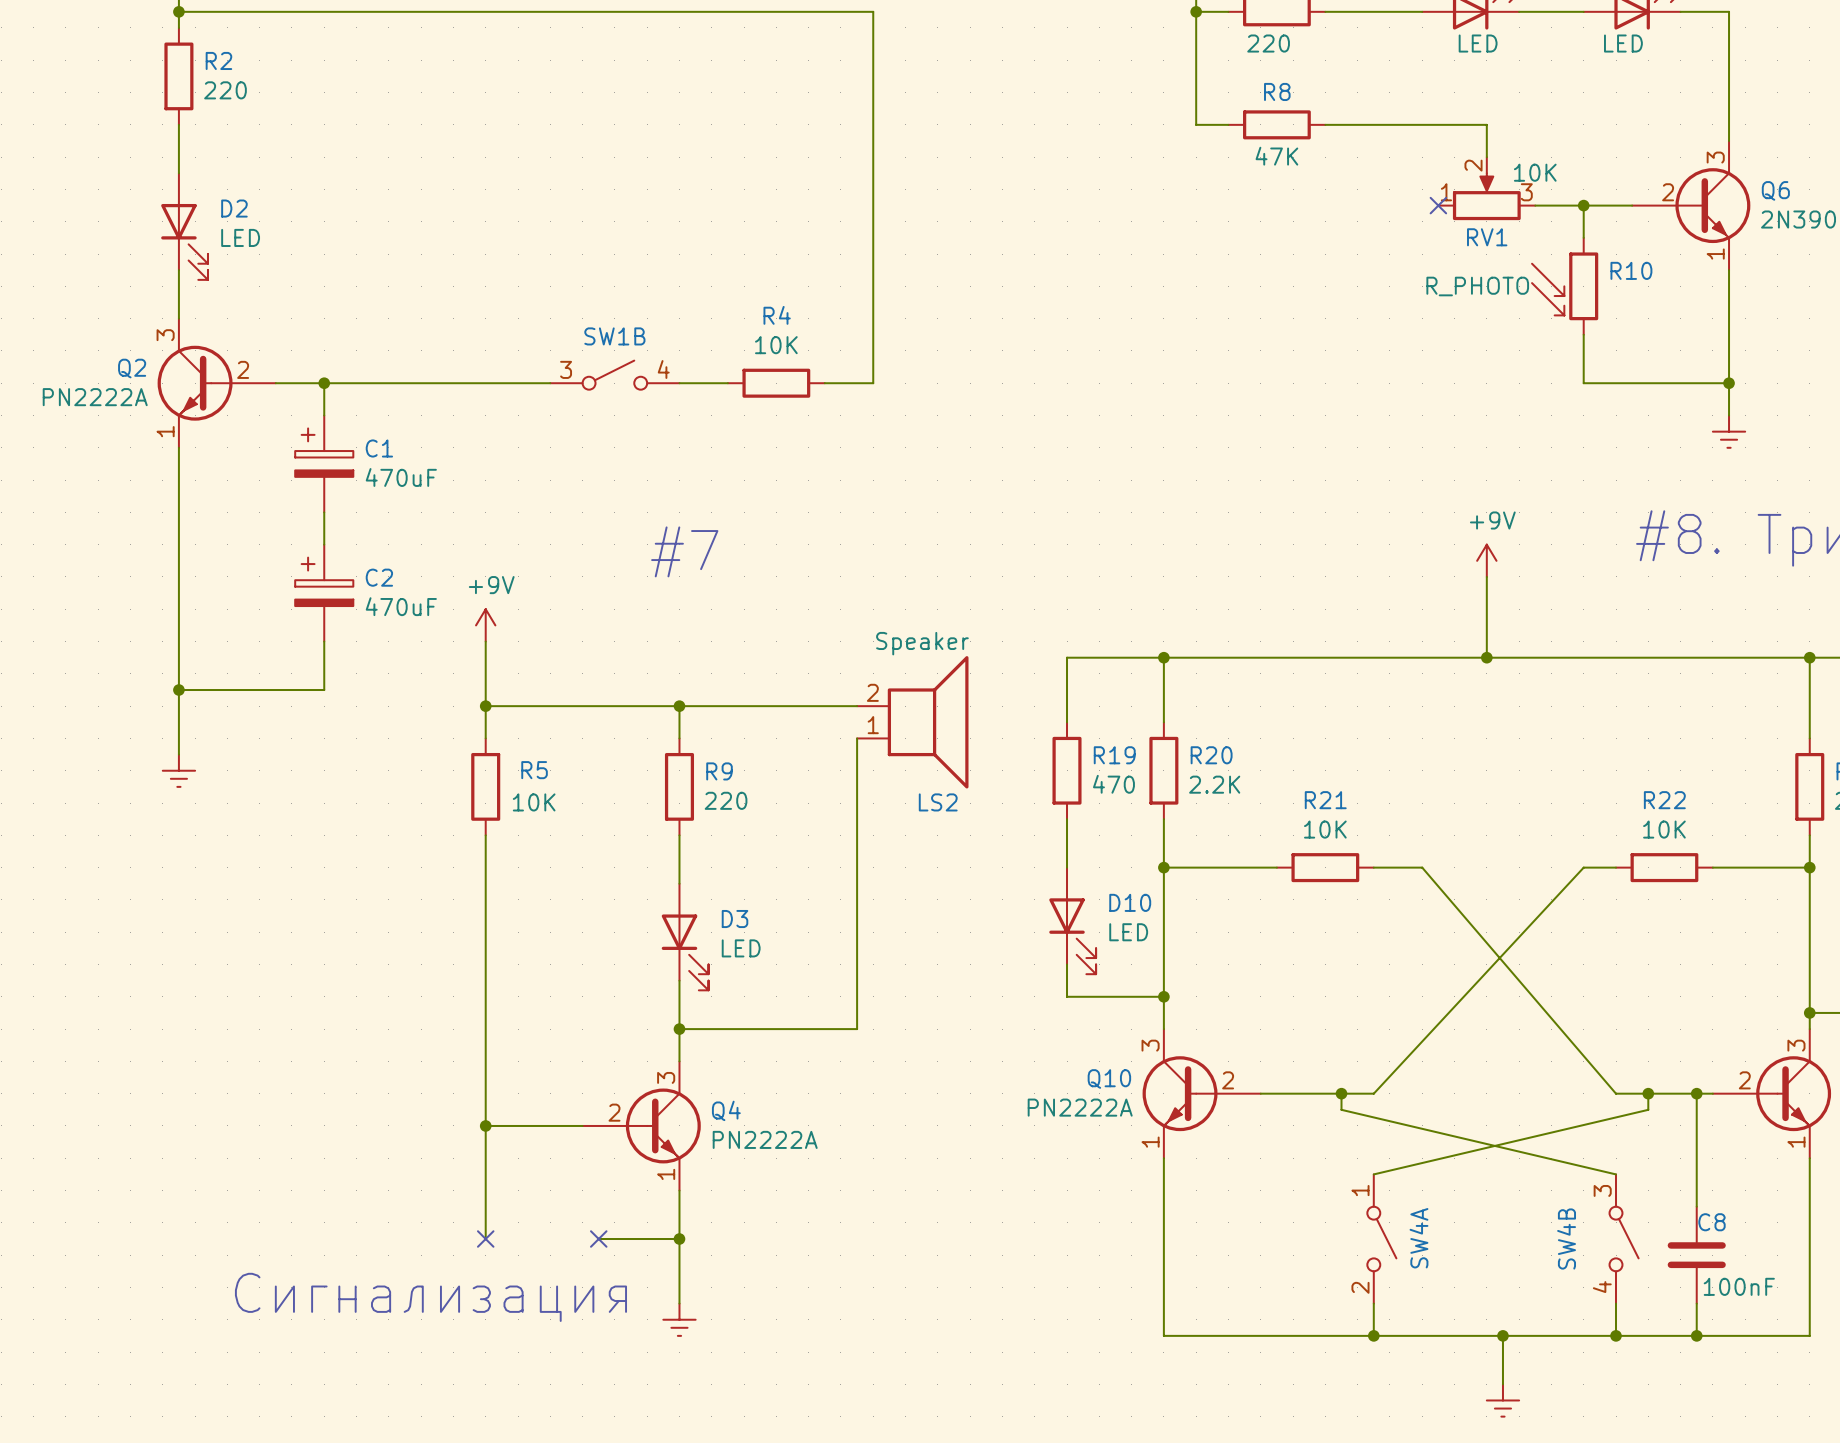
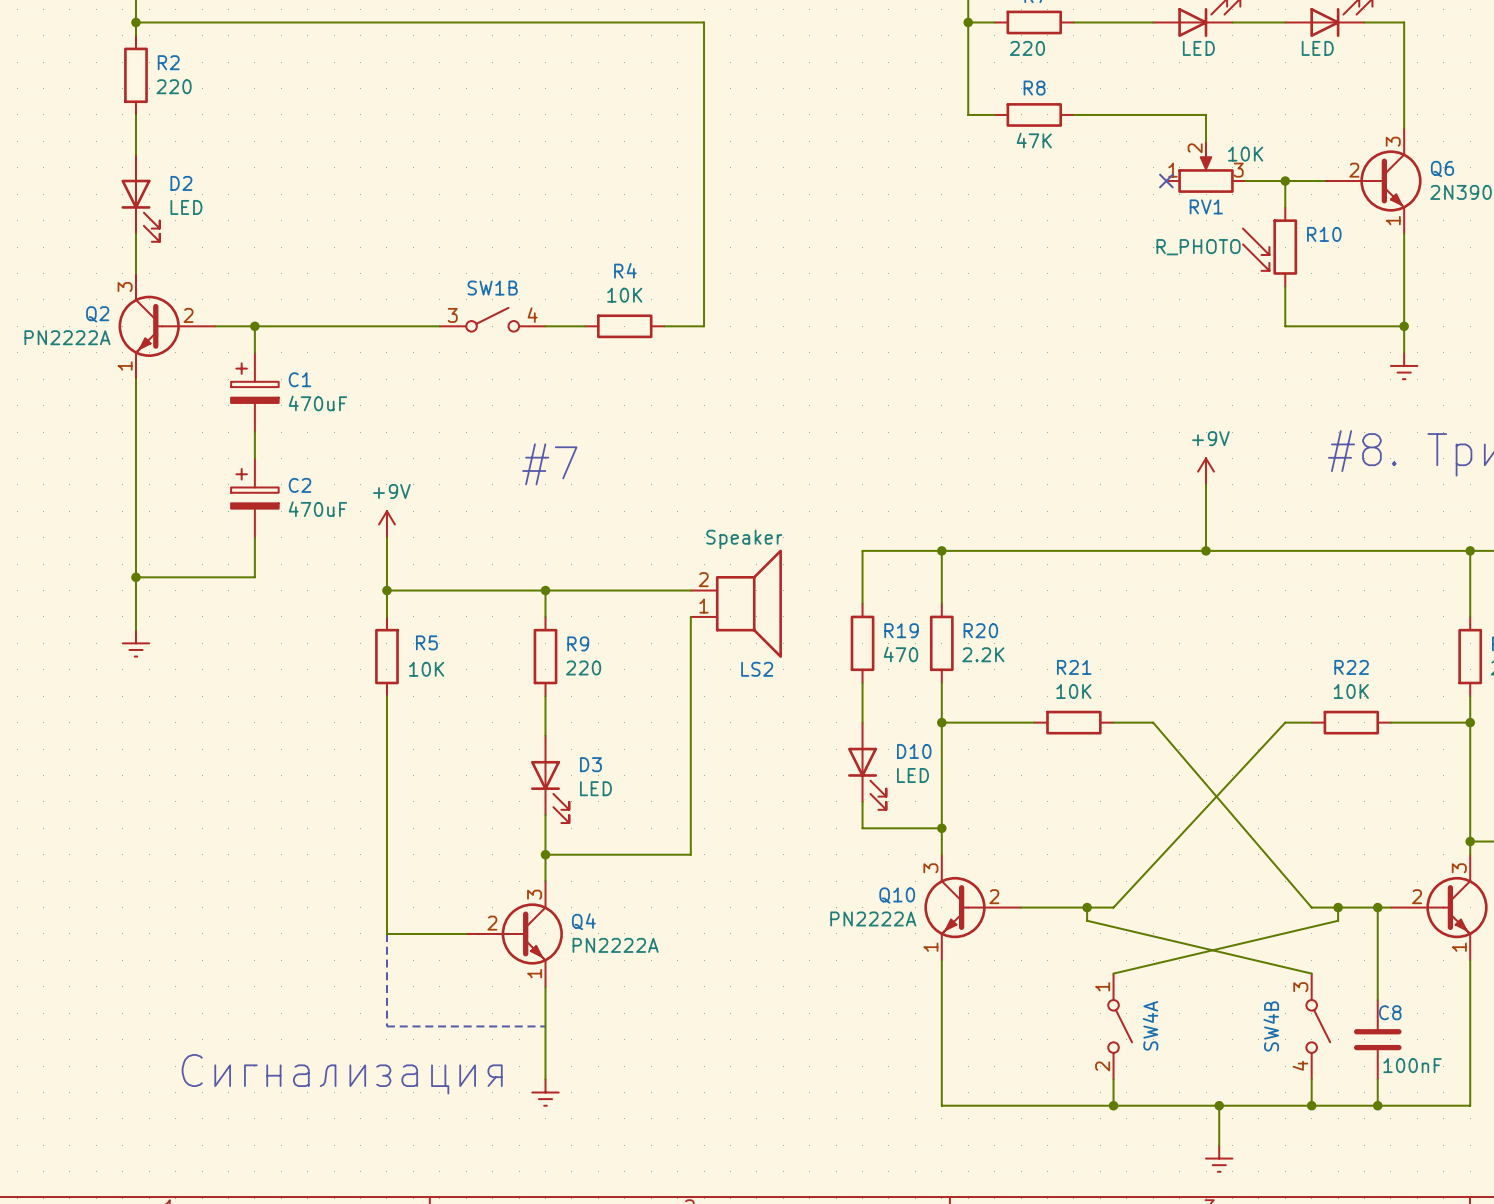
line: none -> (386, 933) (386, 1026) (545, 1026)
junction: (485, 1125) -> none
no-connect mark: (485, 1239) -> none
no-connect mark: (598, 1239) -> none
junction: (679, 1239) -> none

